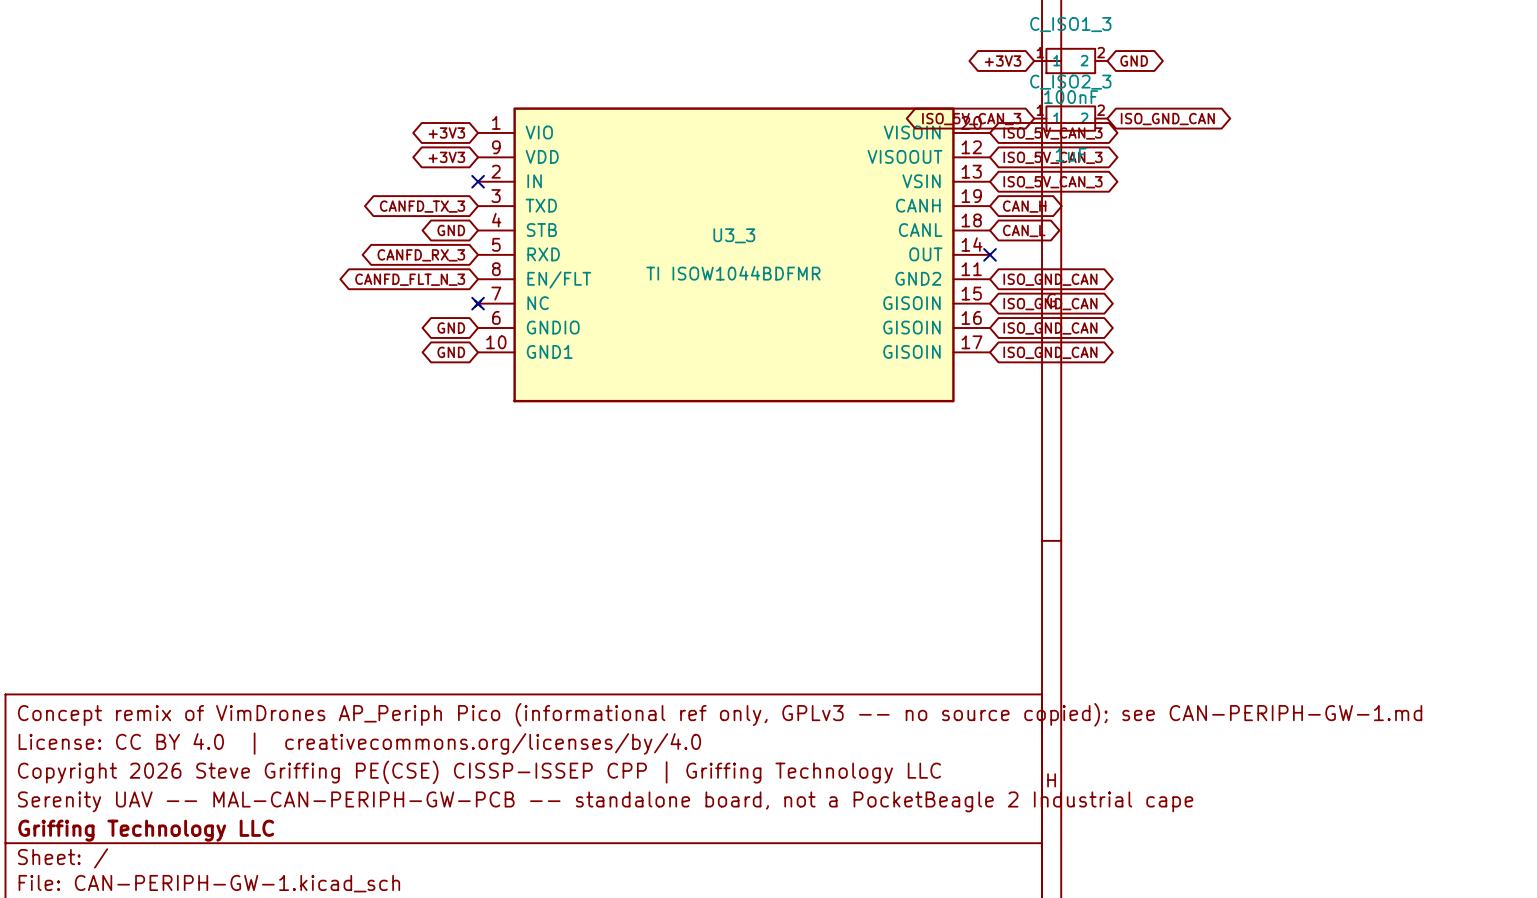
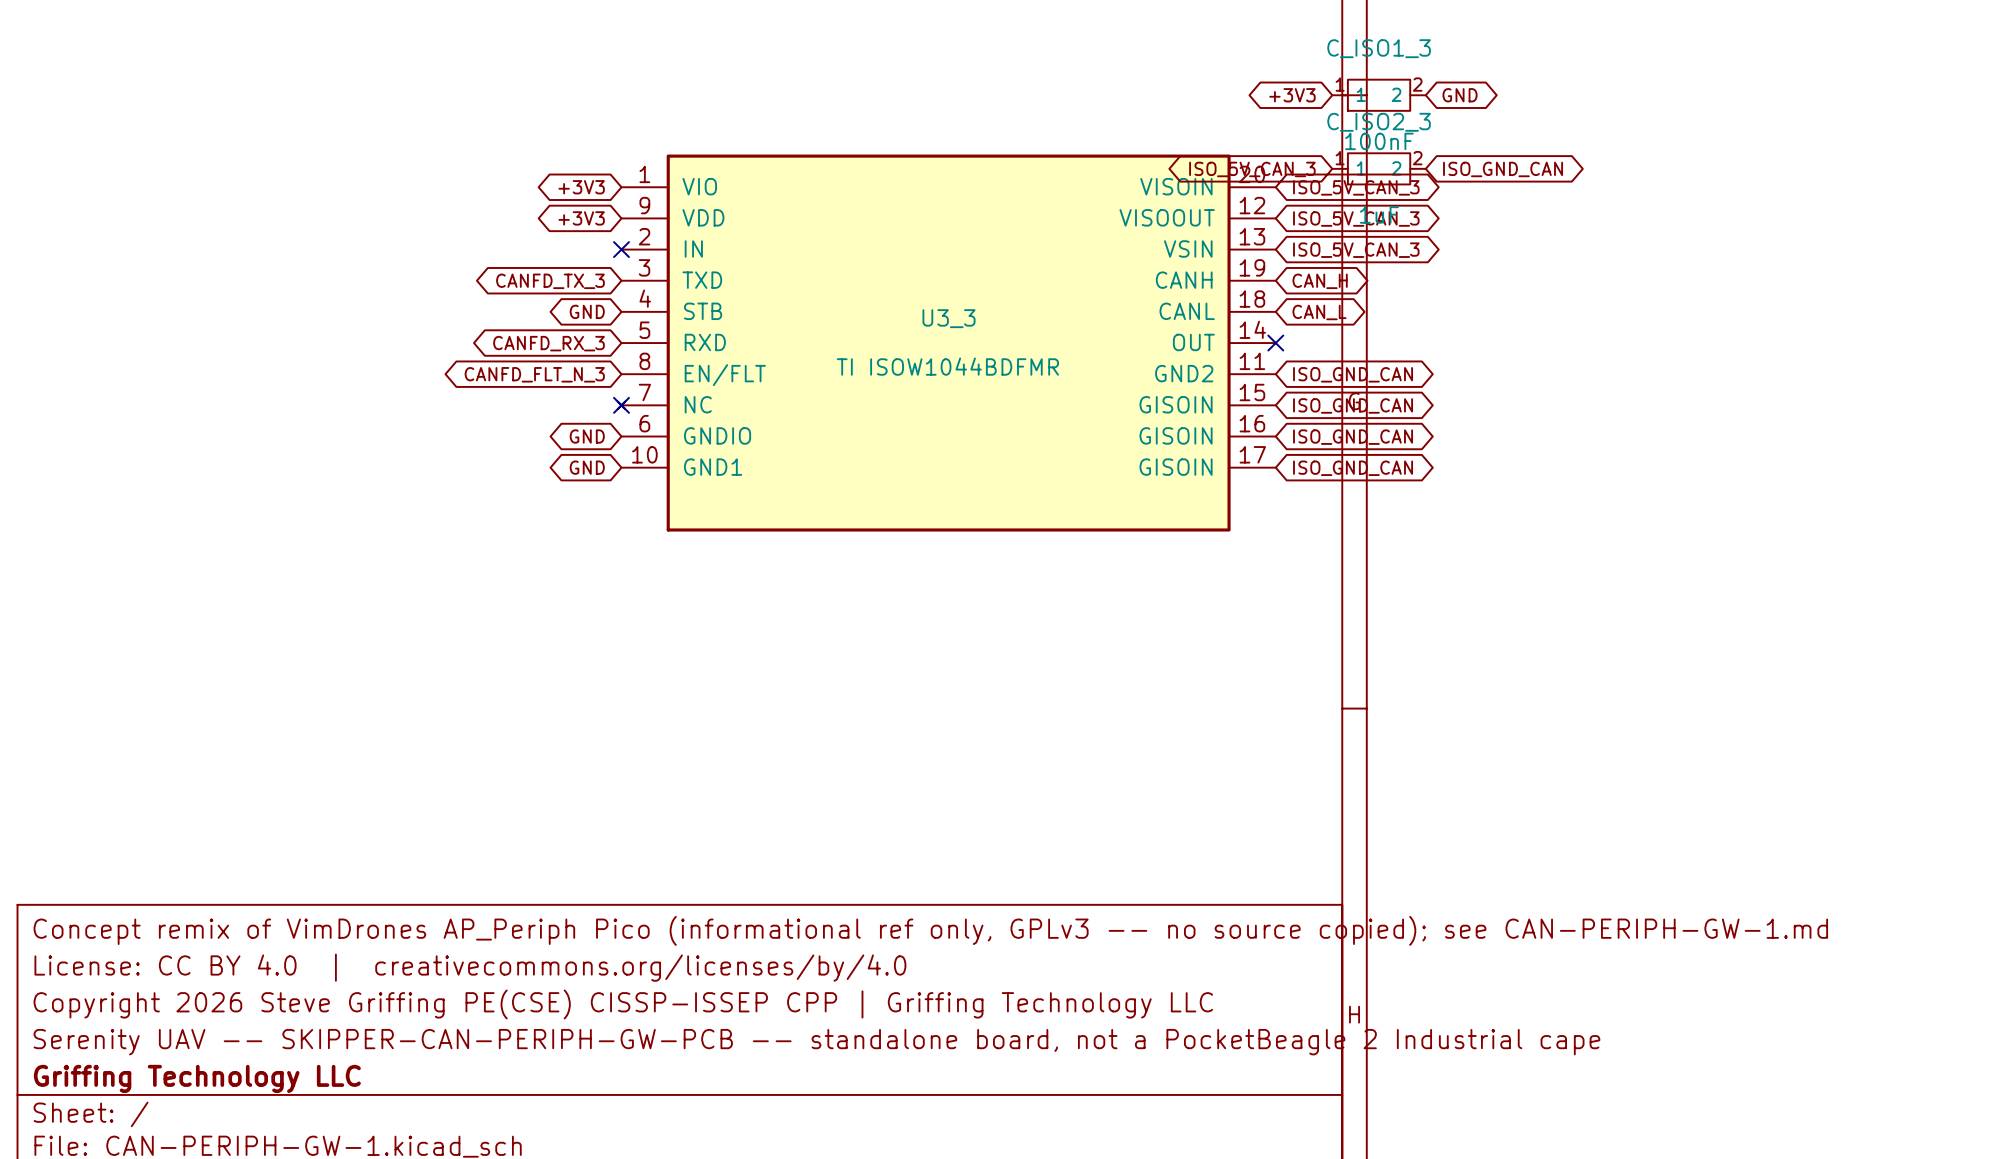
title block: Serenity UAV -- MAL-CAN-PERIPH-GW-PCB -- standalone board, not a PocketBeagle 2 Industrial cape (605, 801) -> Serenity UAV -- SKIPPER-CAN-PERIPH-GW-PCB -- standalone board, not a PocketBeagle 2 Industrial cape (816, 1042)

